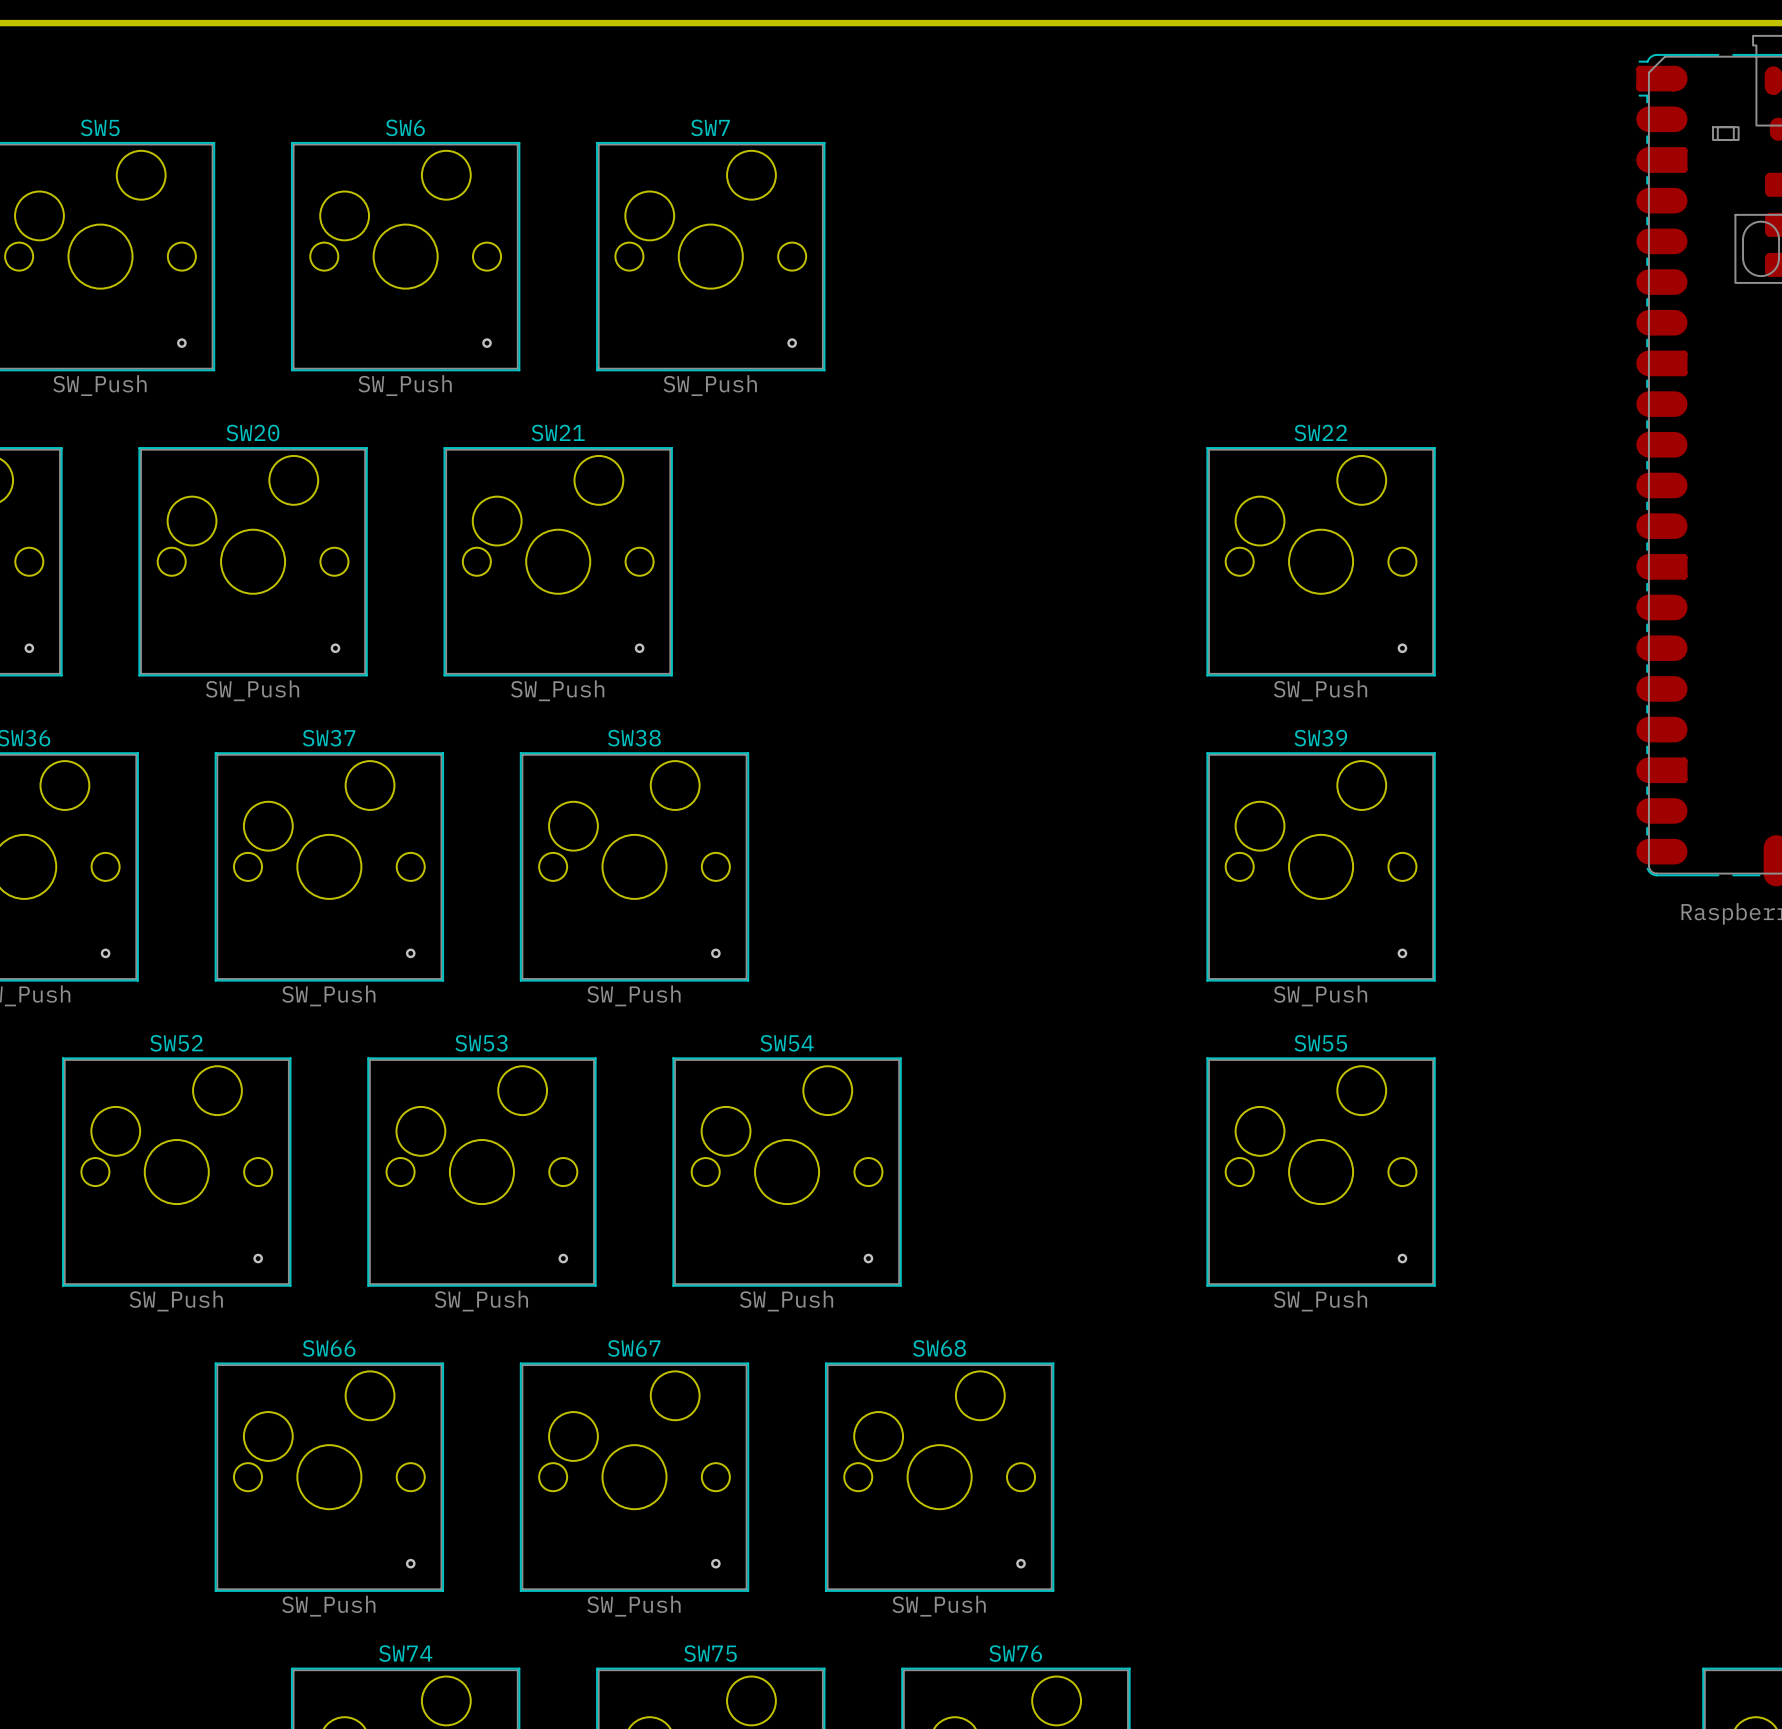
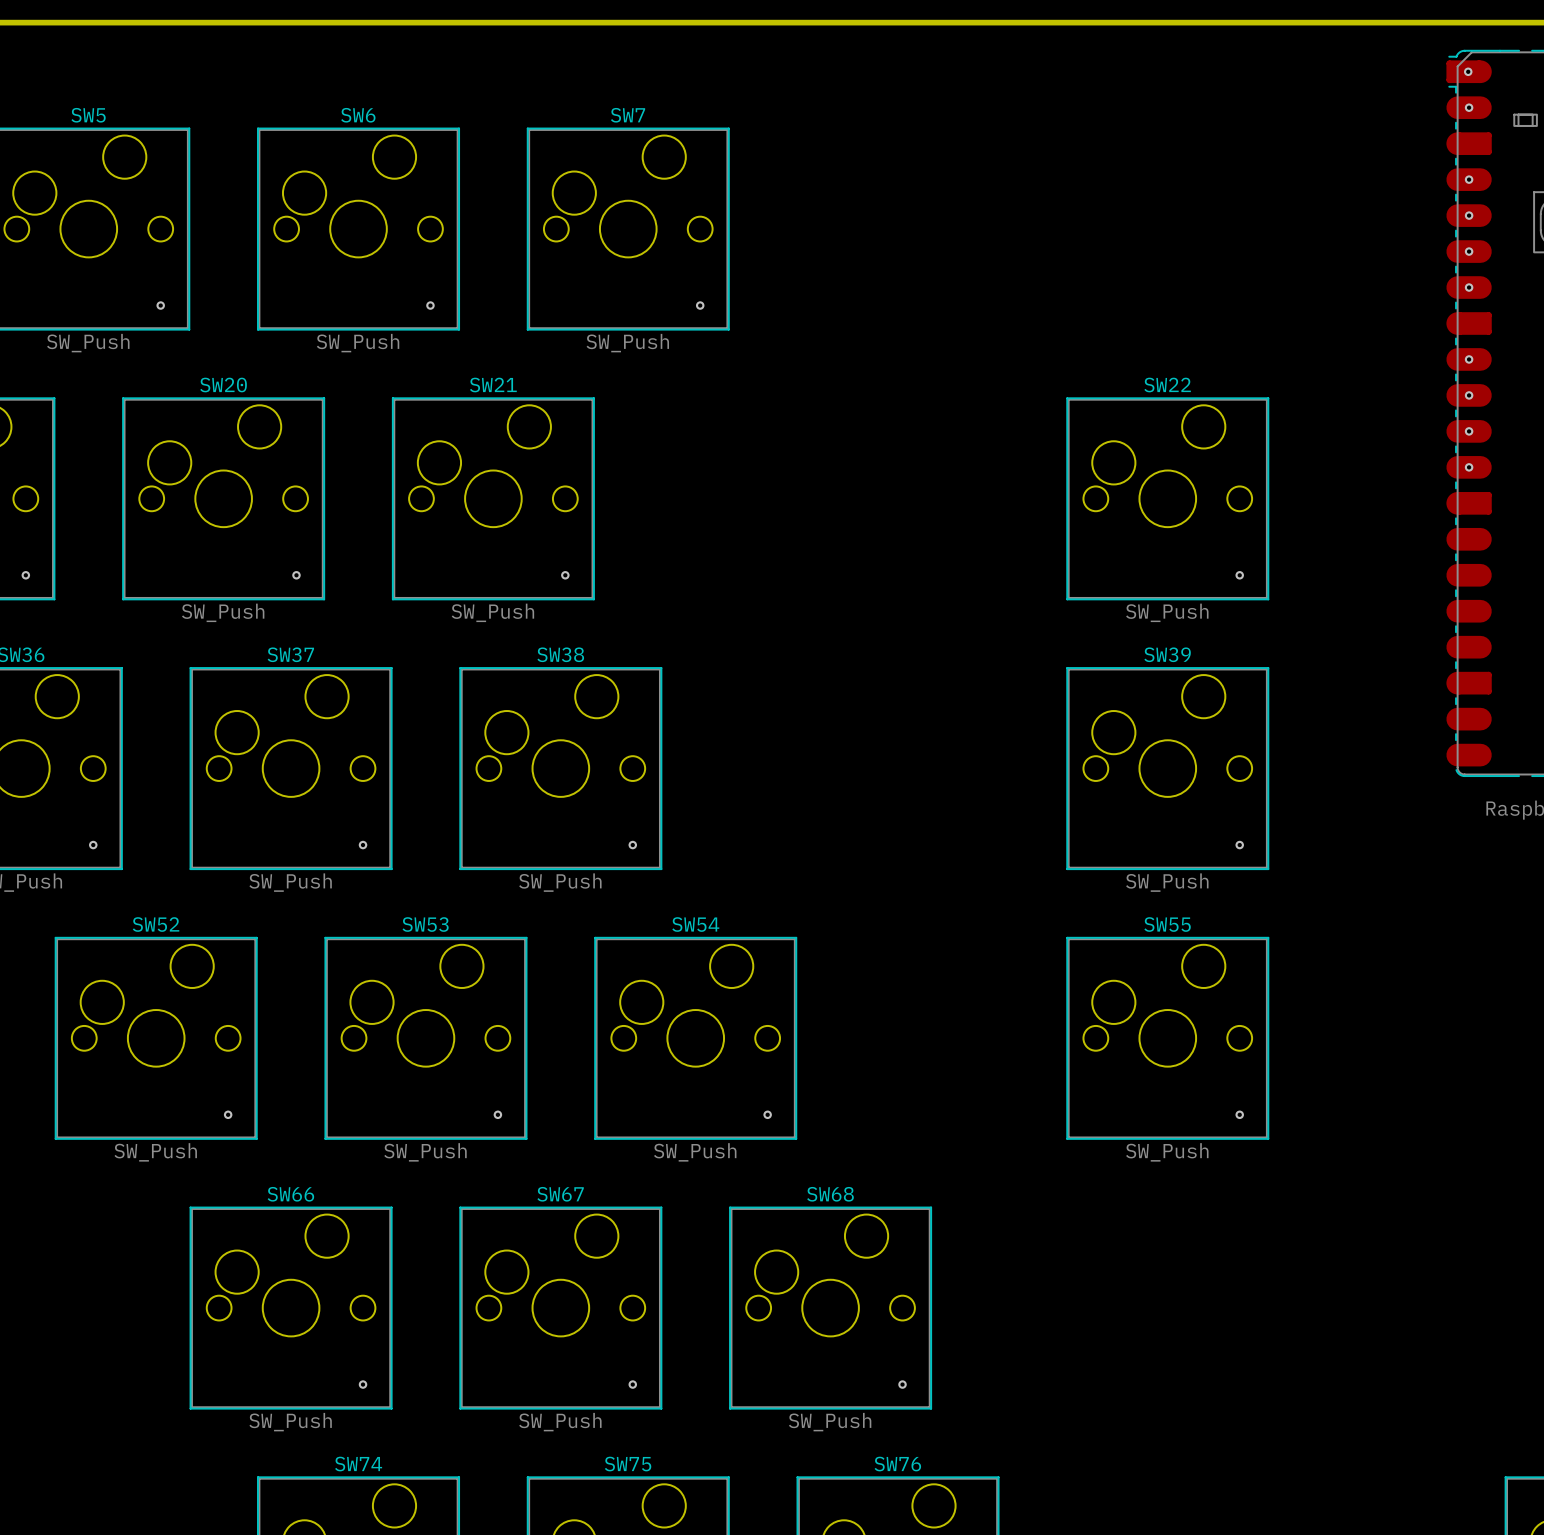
via: none -> (1468, 71)
via: none -> (1469, 107)
via: none -> (1469, 179)
via: none -> (1469, 215)
via: none -> (1469, 251)
via: none -> (1469, 287)
via: none -> (1469, 359)
via: none -> (1469, 395)
via: none -> (1469, 431)
via: none -> (1469, 467)

